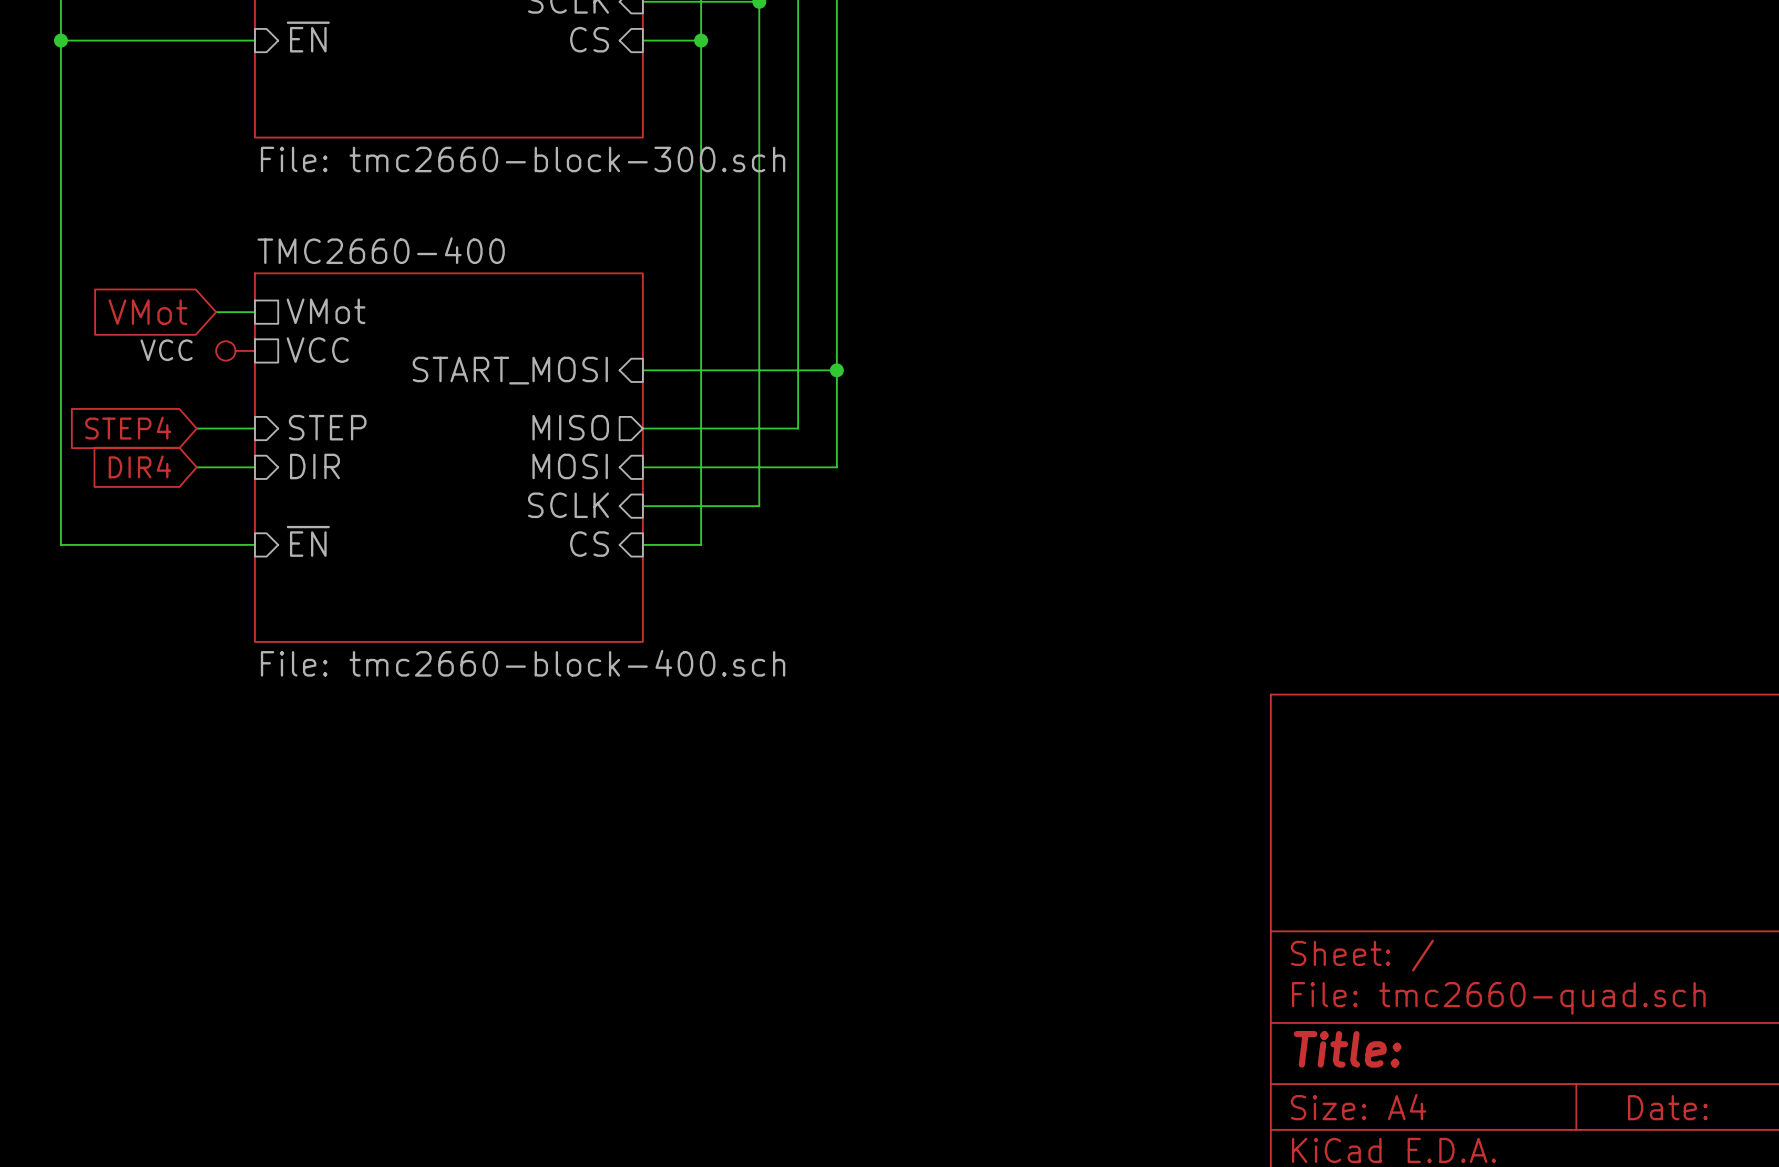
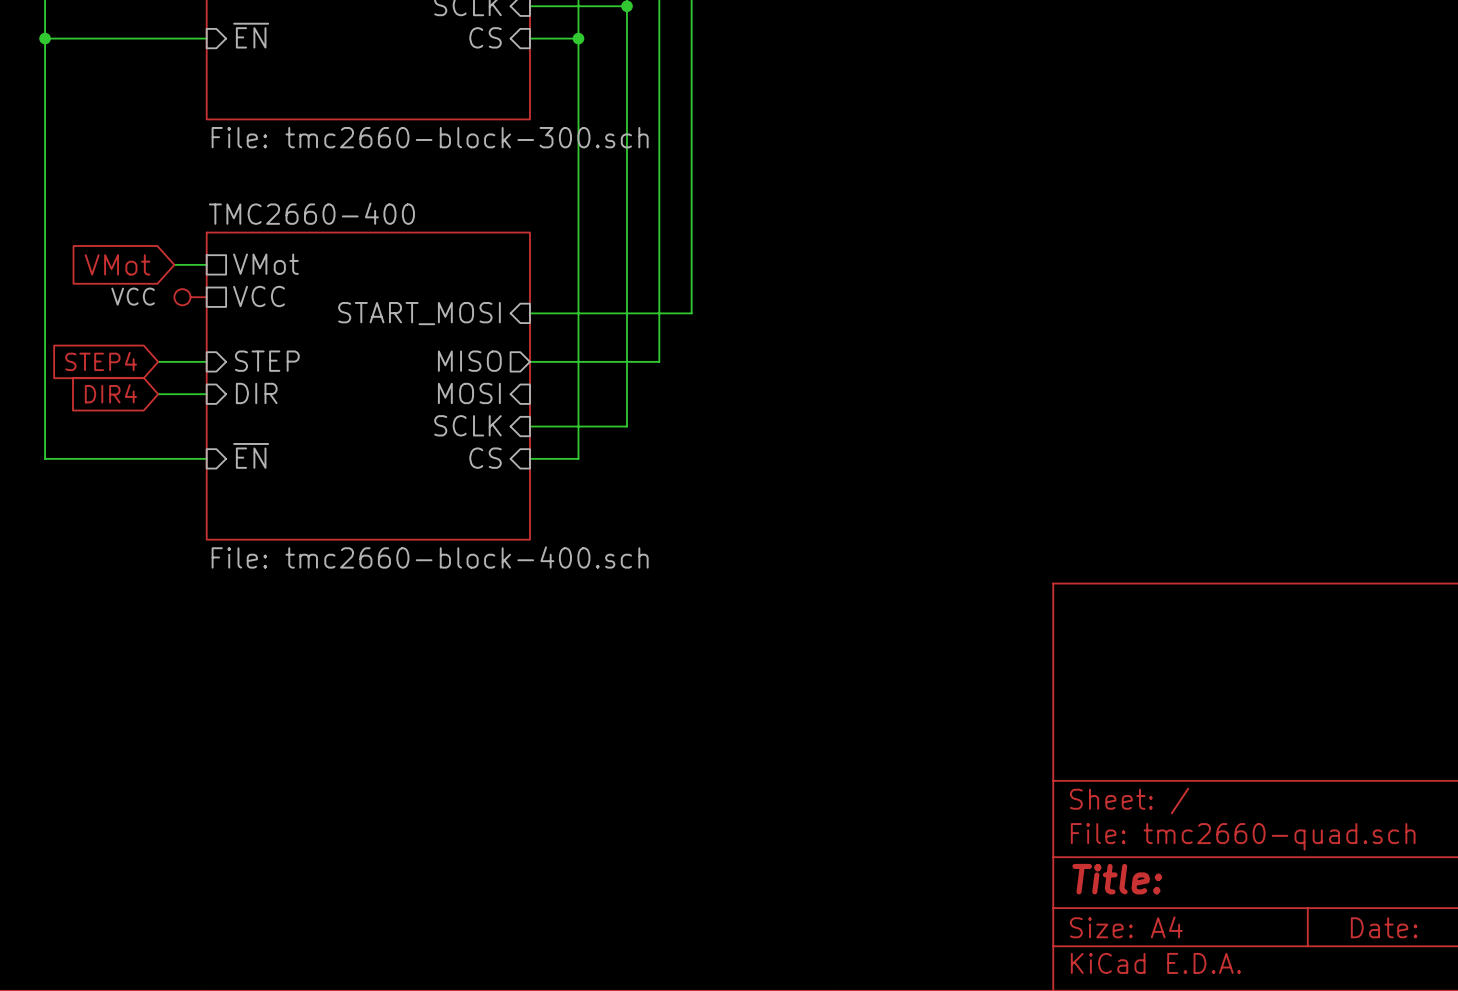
wire: (836, 370) (836, 467) (642, 467) -> none
junction: (836, 370) -> none

